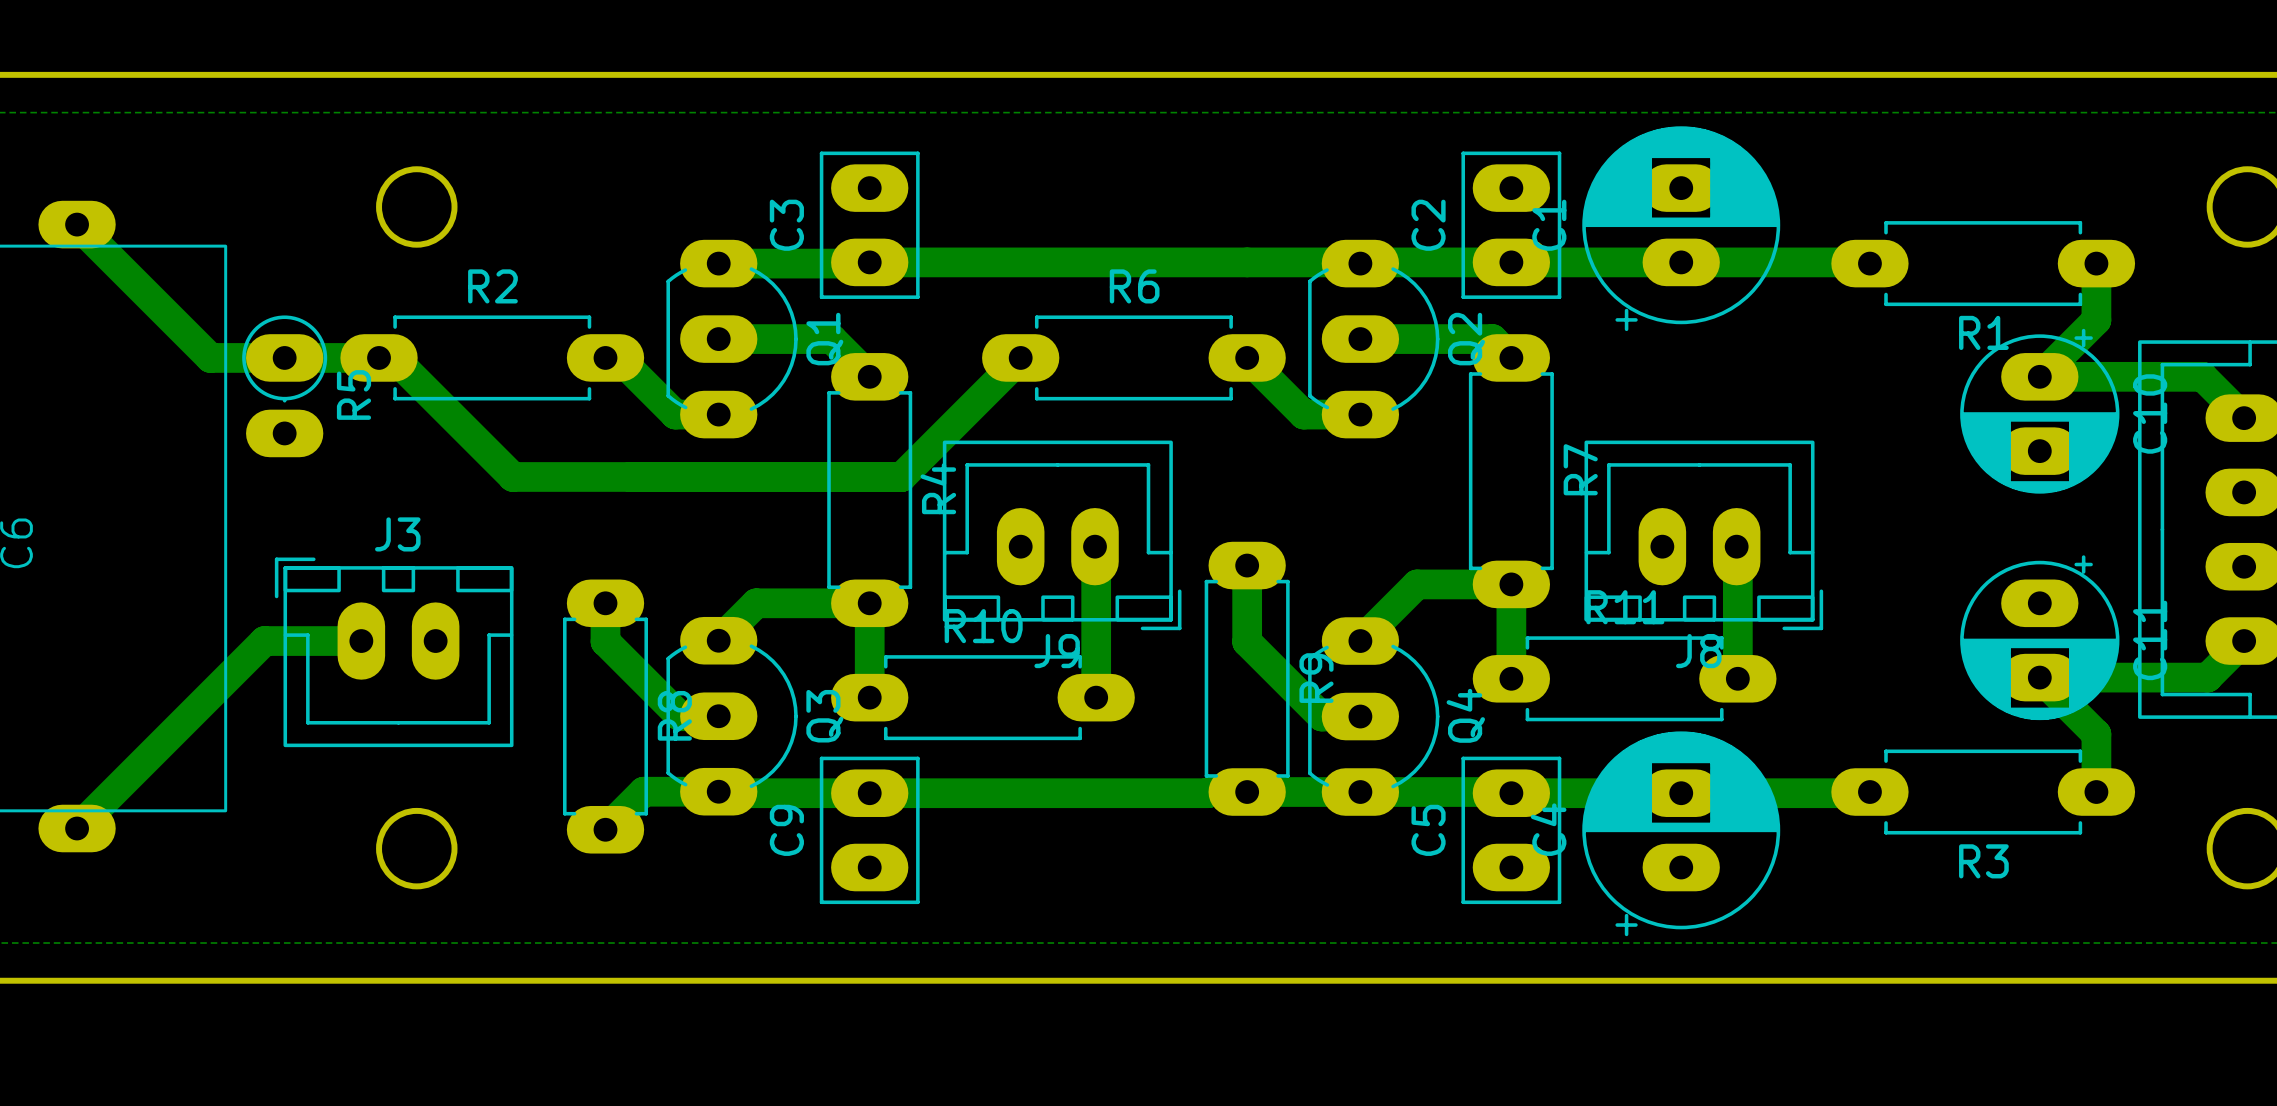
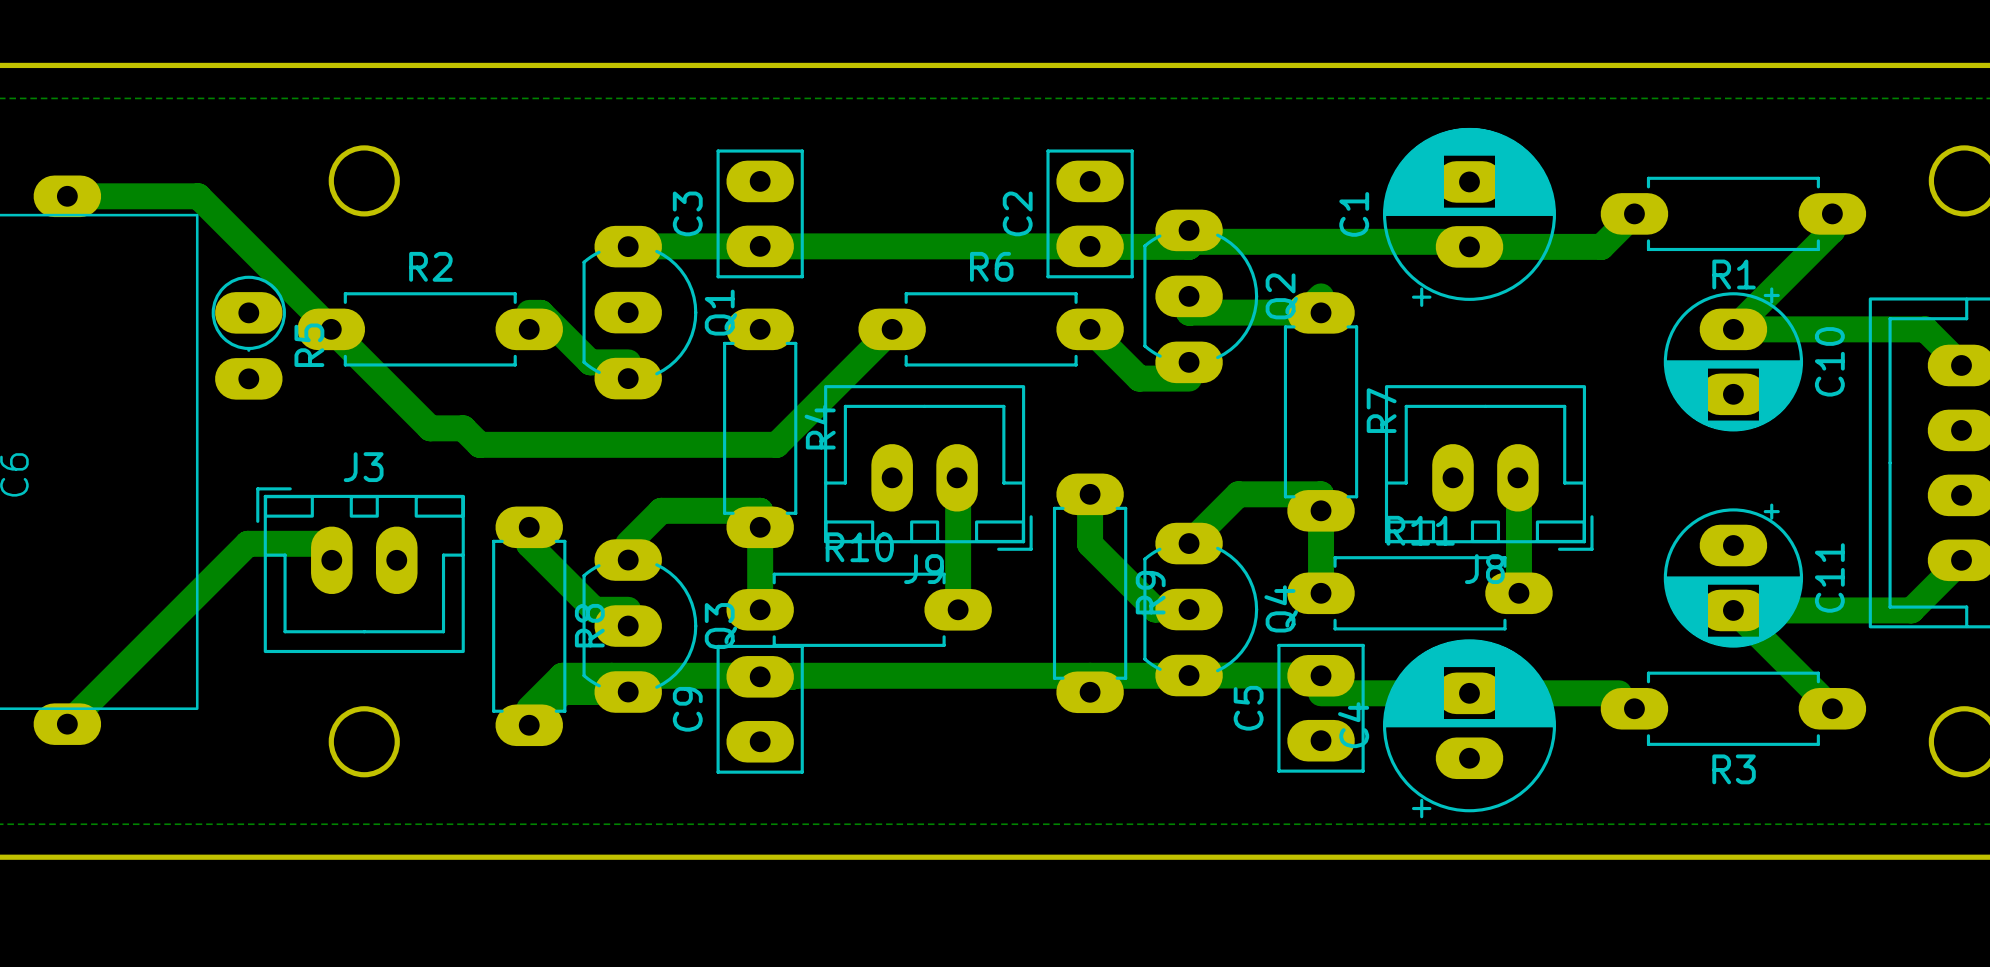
bottom track: none -> (67, 196) (198, 196) (430, 428) (463, 428) (479, 444) (776, 444) (892, 329)
bottom track: (77, 225) (210, 357) (393, 357) (512, 476) (901, 476) (1020, 357) -> none
C3 position: (869, 225) -> (760, 213)
C2 position: (1511, 225) -> (1090, 213)
C1 position: (1681, 228) -> (1469, 217)
bottom track: none -> (1634, 213) (1601, 246) (1469, 246) (1464, 241) (1193, 241) (1188, 246) (1089, 246)
bottom track: (869, 262) (1359, 262) -> none
bottom track: (1852, 262) (1360, 263) -> none
bottom track: (718, 263) (868, 263) -> none
R1 position: (1983, 263) -> (1733, 213)
bottom track: (2096, 263) (2096, 320) (2039, 376) -> (1832, 213) (1832, 230) (1733, 329) (1782, 329)
bottom track: none -> (628, 246) (1090, 246)
bottom track: (718, 339) (831, 339) (869, 376) -> none
Q1 position: (732, 339) -> (639, 312)
bottom track: (1360, 339) (1492, 339) (1511, 357) -> none
bottom track: none -> (1321, 296) (1304, 312) (1189, 312)
R2 position: (492, 357) -> (430, 329)
R6 position: (1133, 357) -> (991, 329)
bottom track: (1247, 357) (1303, 414) (1360, 414) -> (1090, 329) (1139, 378) (1189, 378)
C10 position: (2039, 411) -> (1733, 359)
bottom track: (1511, 584) (1417, 584) (1360, 641) -> (1321, 510) (1321, 494) (1238, 494) (1189, 543)
bottom track: (869, 603) (756, 603) (718, 640) -> (760, 527) (760, 510) (661, 510) (628, 543)
bottom track: (1247, 622) (1247, 641) (1321, 716) (1360, 716) -> (1090, 544) (1155, 609) (1189, 609)
bottom track: (605, 623) (605, 641) (680, 716) (718, 716) -> (529, 544) (594, 609) (628, 609)
C11 position: (2039, 637) -> (1733, 575)
bottom track: (264, 641) (361, 641) -> (231, 560) (247, 543) (332, 543)
J3 position: (394, 652) -> (360, 570)
bottom track: (2207, 677) (2039, 677) (2096, 734) (2096, 792) -> (1929, 592) (1911, 610) (1733, 610)
bottom track: none -> (1734, 610) (1831, 708)
Q4 position: (1373, 716) -> (1200, 609)
bottom track: none -> (1189, 675) (1320, 675)
bottom track: none -> (1188, 675) (562, 675) (529, 708)
bottom track: (1510, 792) (720, 793) -> none
R3 position: (1983, 792) -> (1733, 708)
C9 position: (869, 830) -> (760, 709)
C5 position: (1511, 830) -> (1321, 708)

